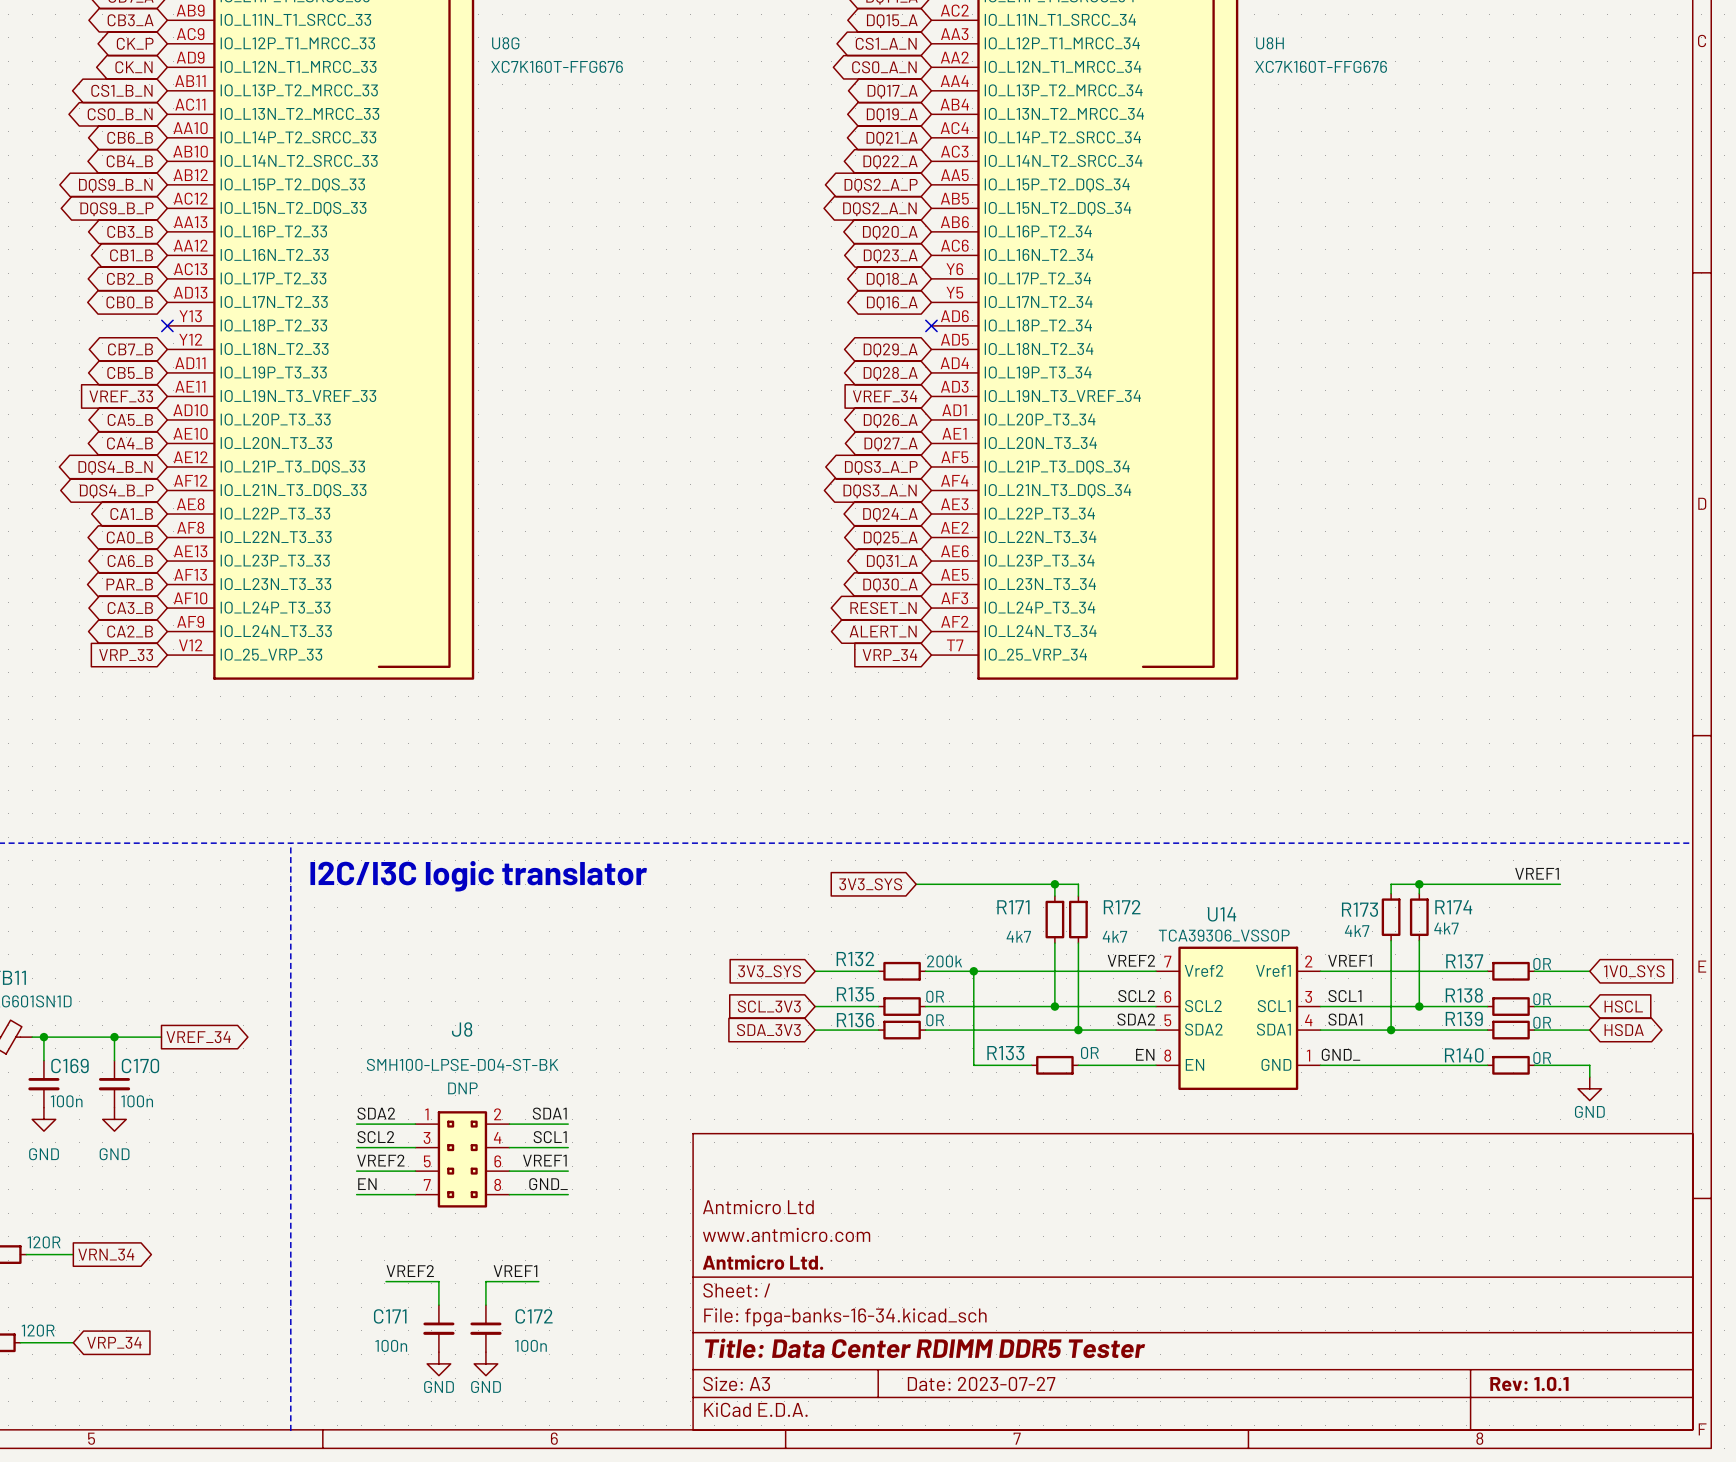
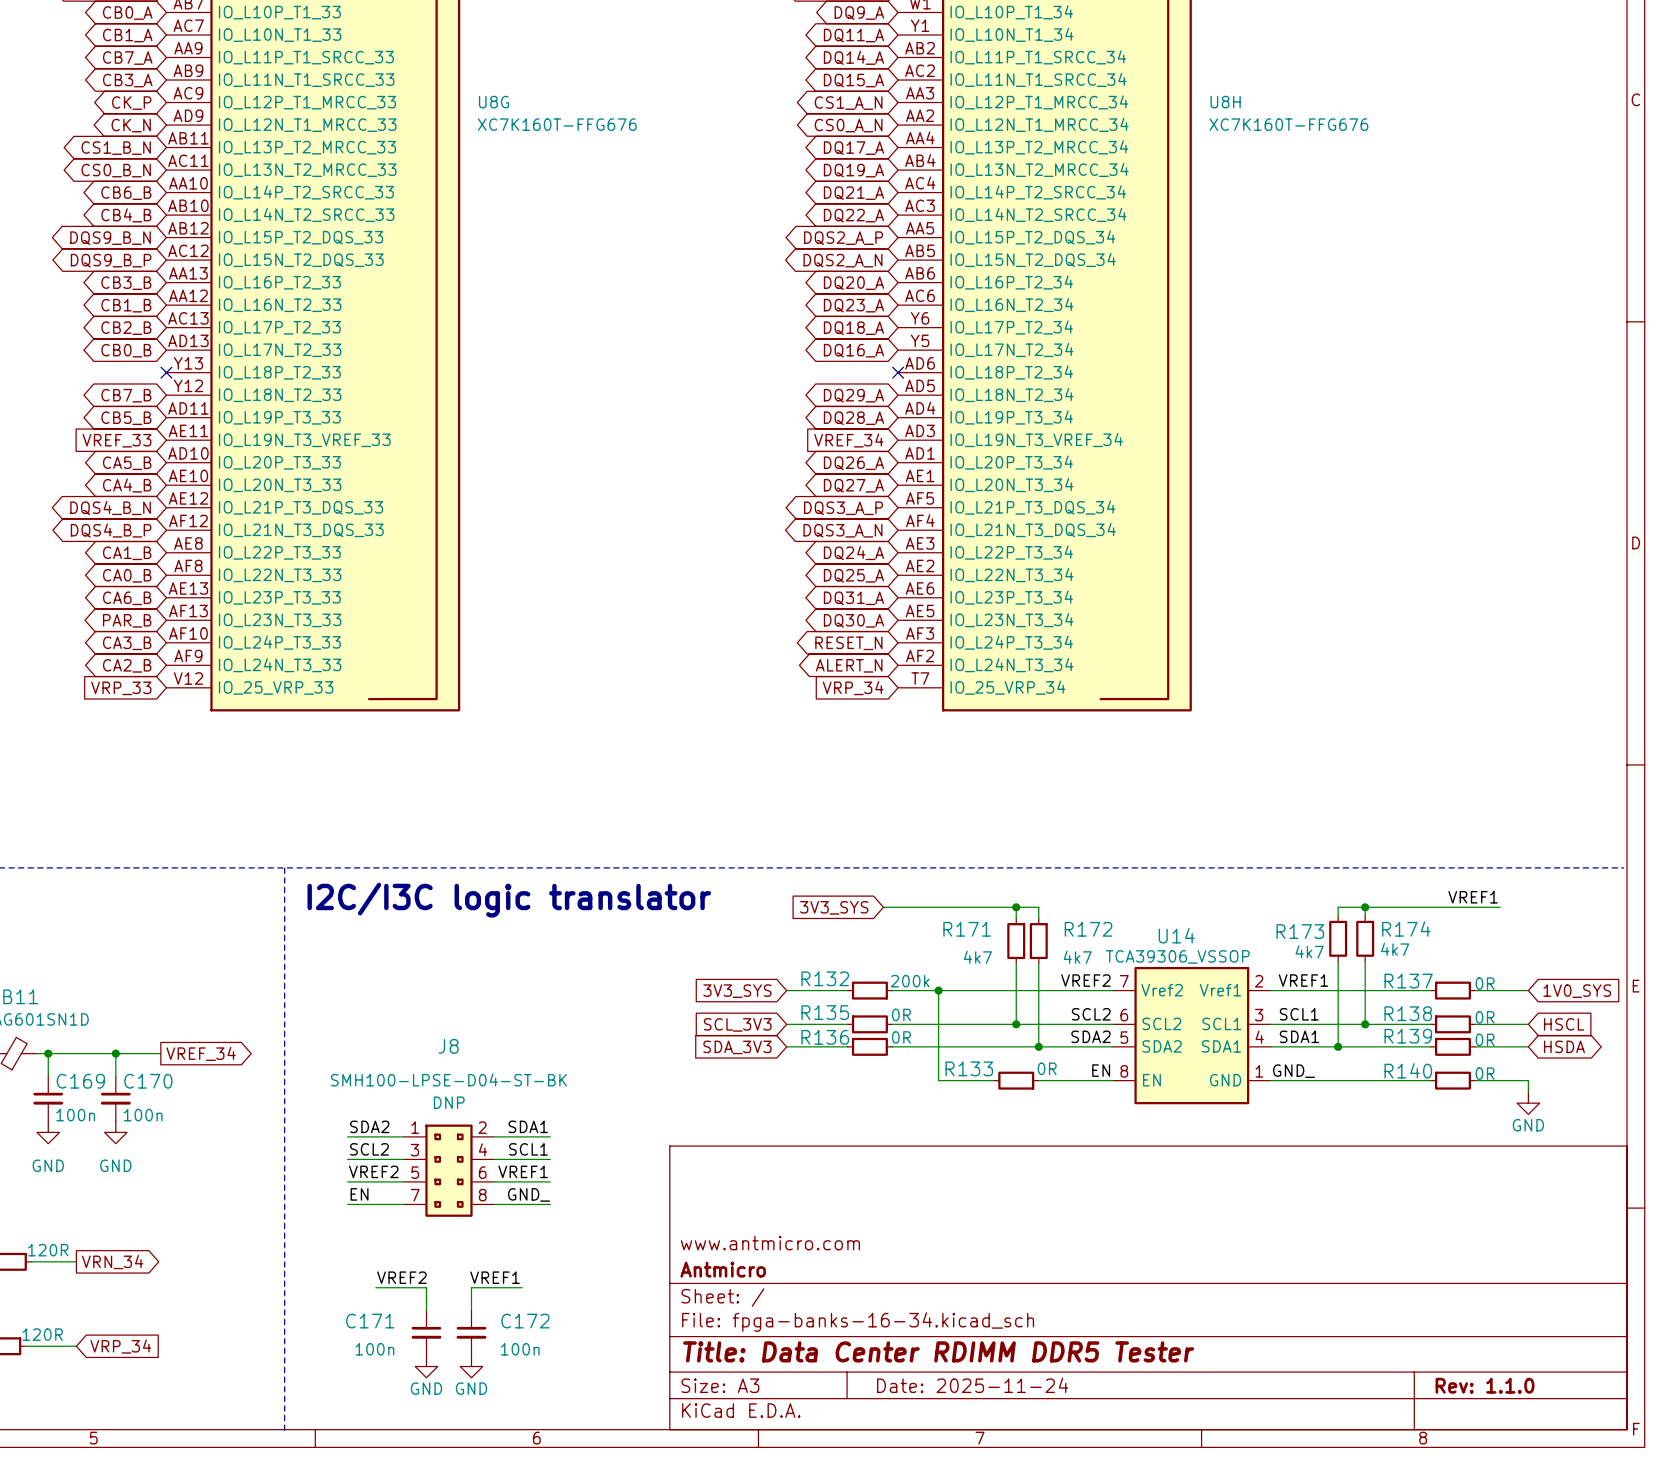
title block: Antmicro Ltd (758, 1207) -> none
title block: Antmicro Ltd. (763, 1262) -> Antmicro (723, 1269)
title block: Date: 2023-07-27 (981, 1383) -> Date: 2025-11-24 (972, 1385)
title block: Rev: 1.0.1 (1529, 1384) -> Rev: 1.1.0 (1485, 1385)

